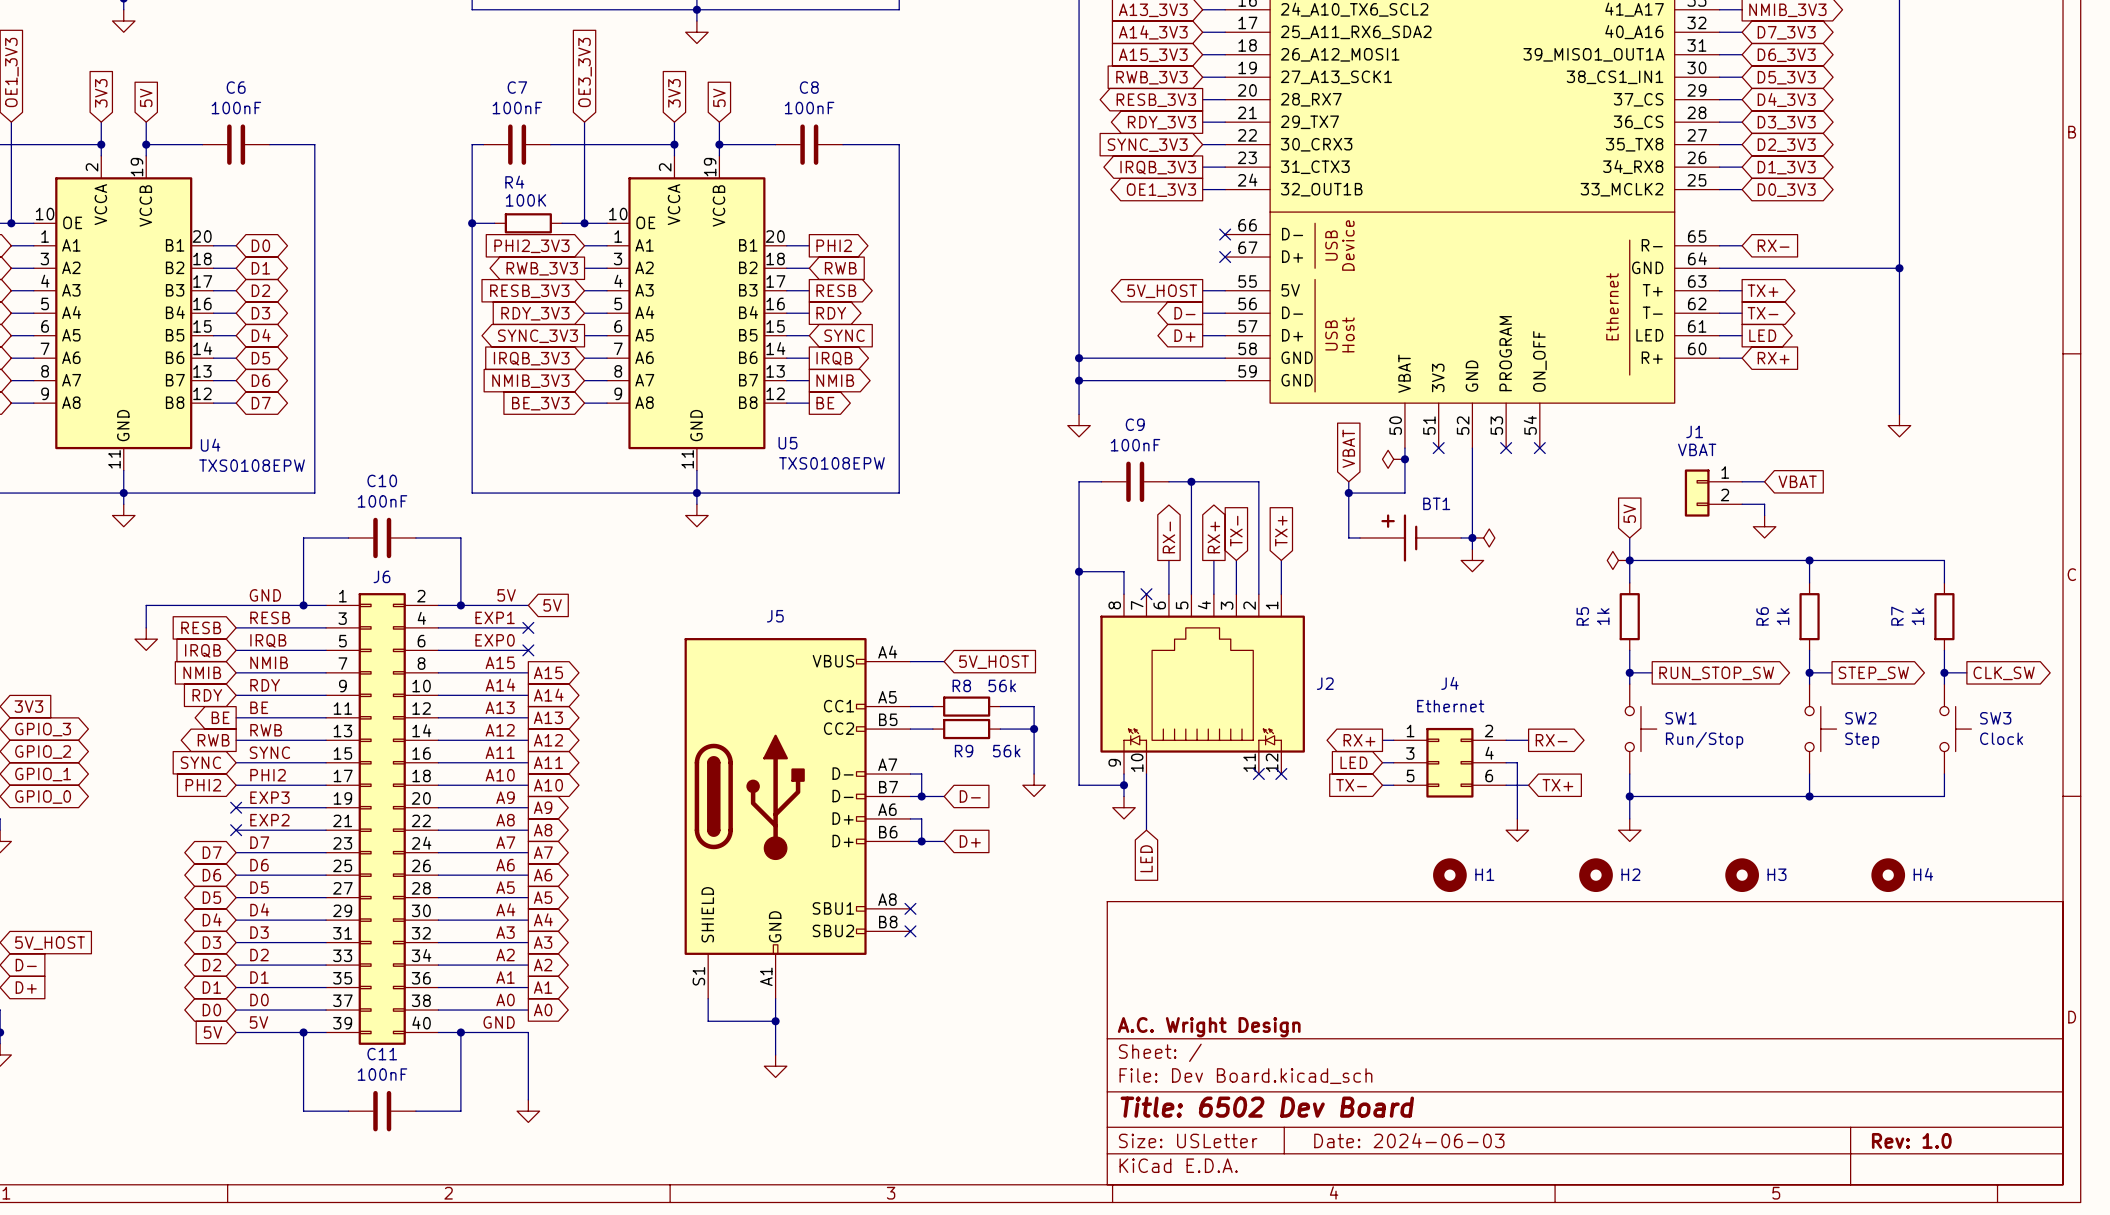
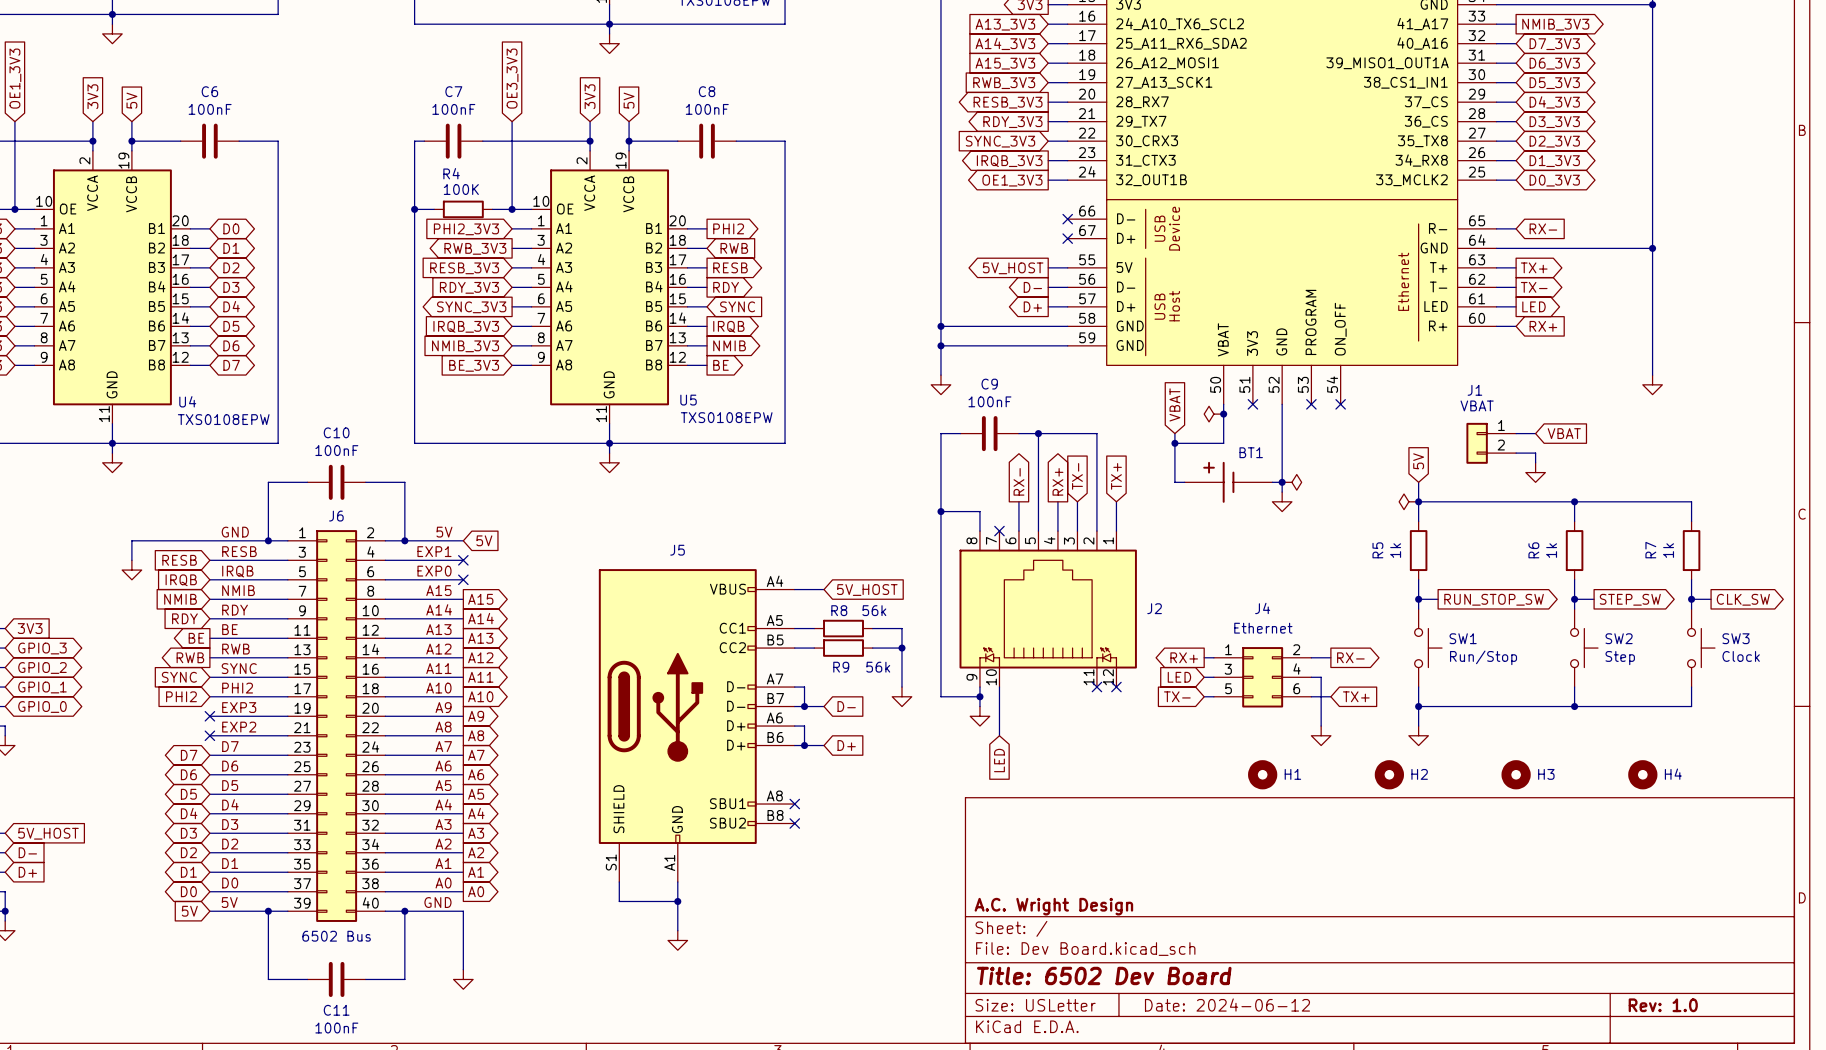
C11 name position: C11 (382, 1054) -> C11 (336, 1010)
J6 value: none -> 6502 Bus (336, 936)
C11 value position: 100nF (382, 1074) -> 100nF (336, 1028)
title block: Date: 2024-06-03 (1409, 1140) -> Date: 2024-06-12 (1227, 1005)

